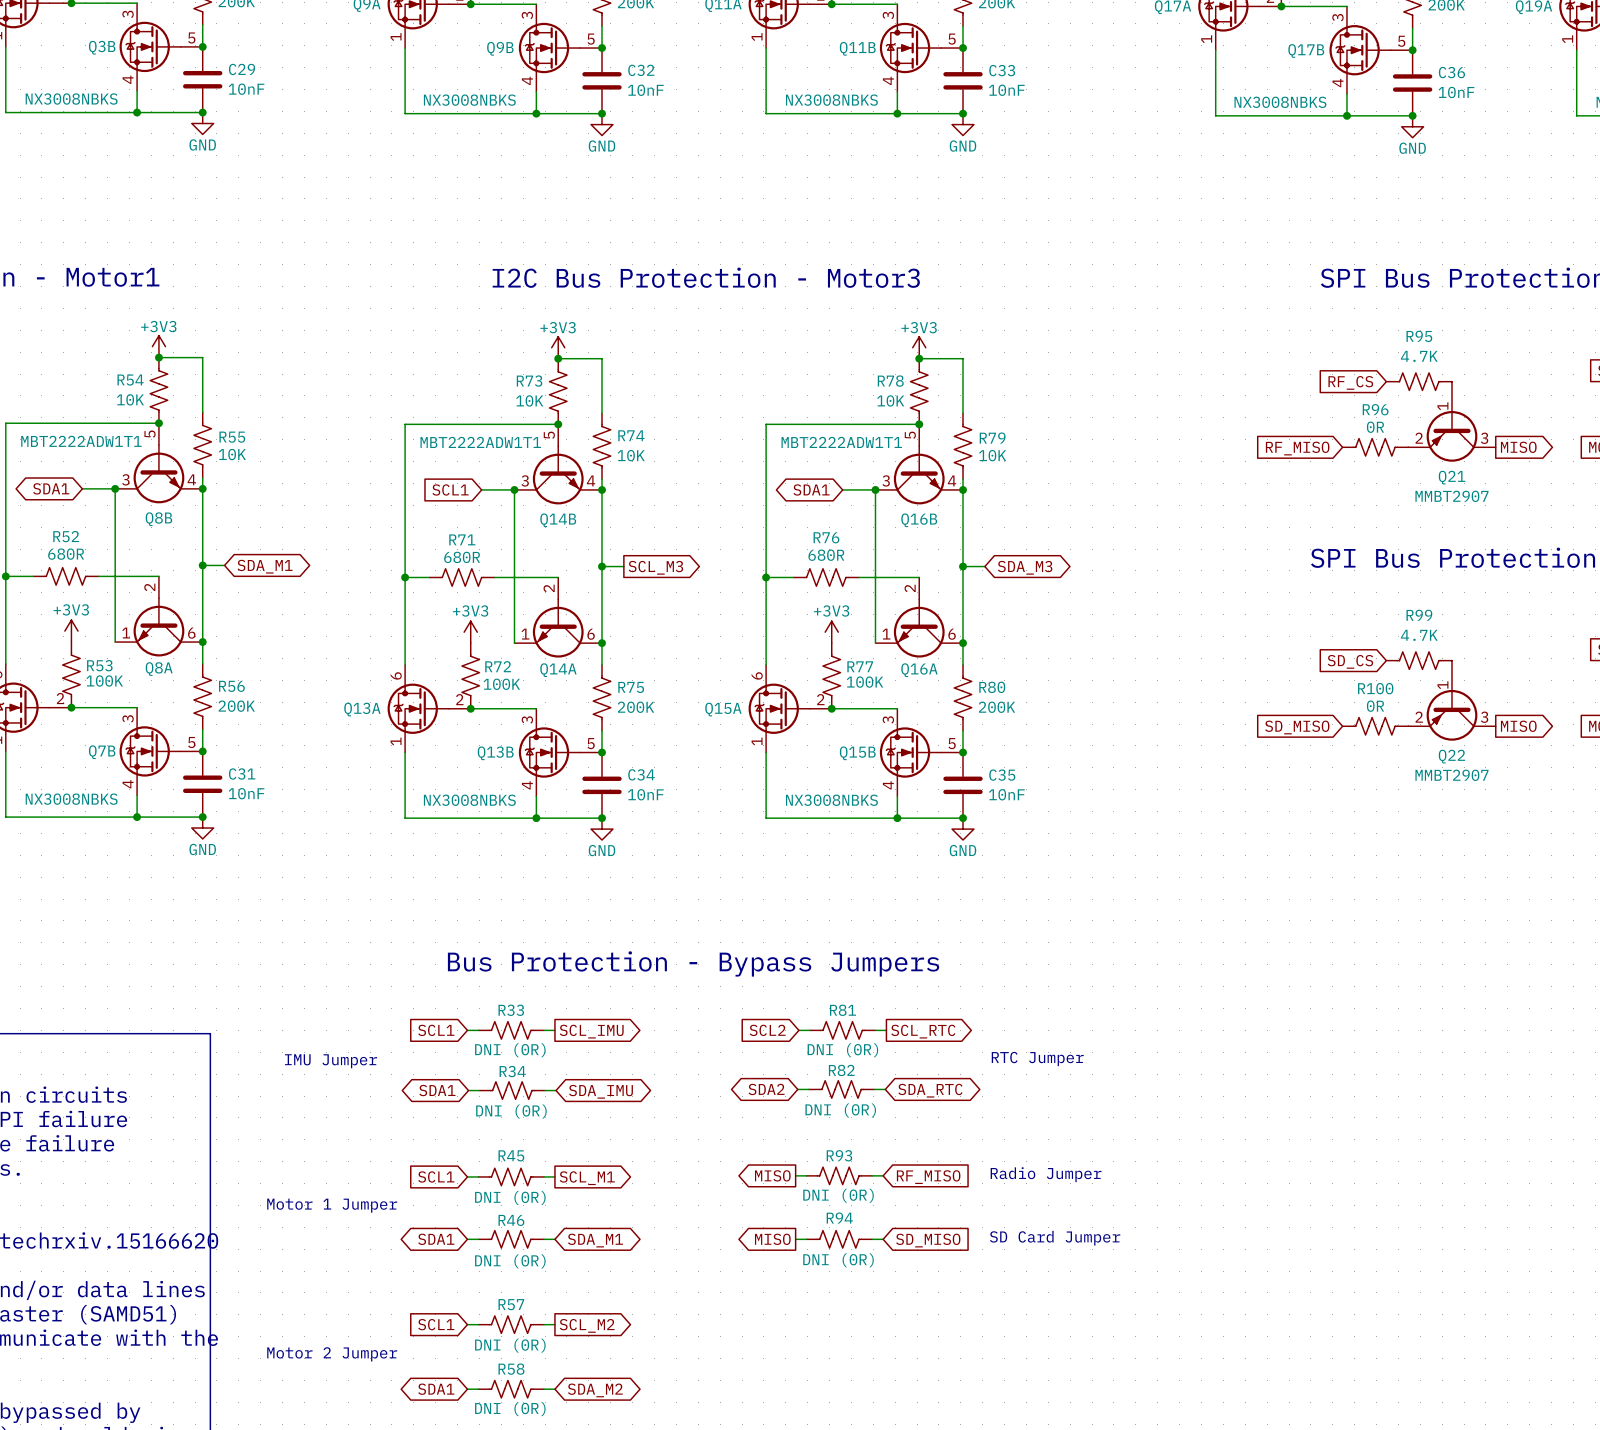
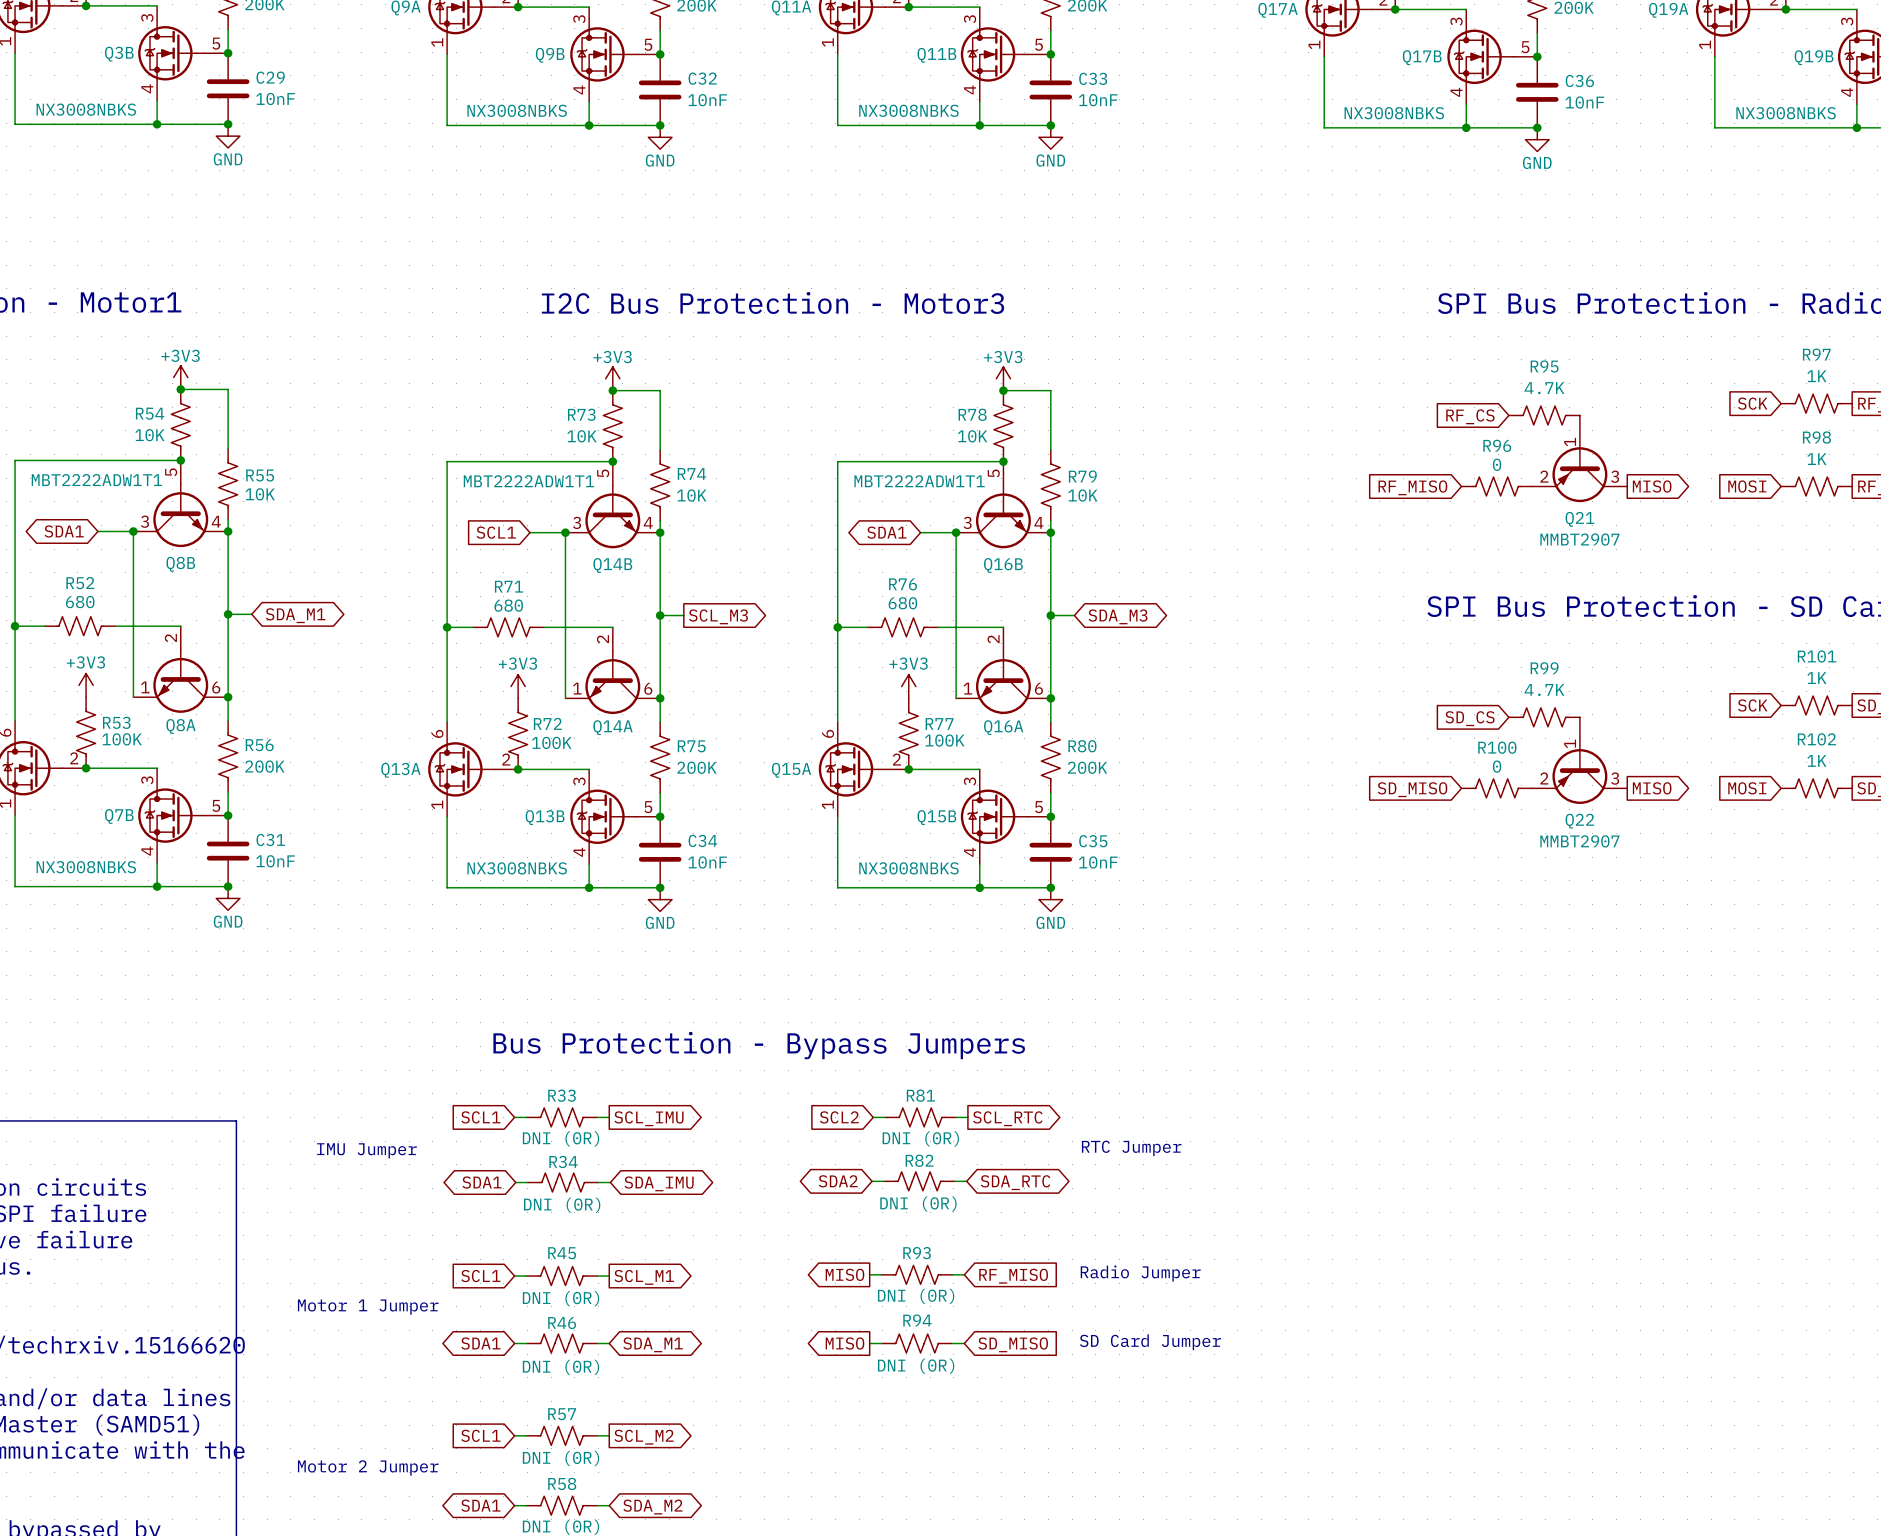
R96 value: 0R (1375, 427) -> 0 (1497, 464)
R52 value: 680R (66, 554) -> 680 (80, 602)
R76 value: 680R (826, 555) -> 680 (902, 603)
R71 value: 680R (462, 557) -> 680 (508, 605)
R100 value: 0R (1375, 706) -> 0 (1497, 766)

